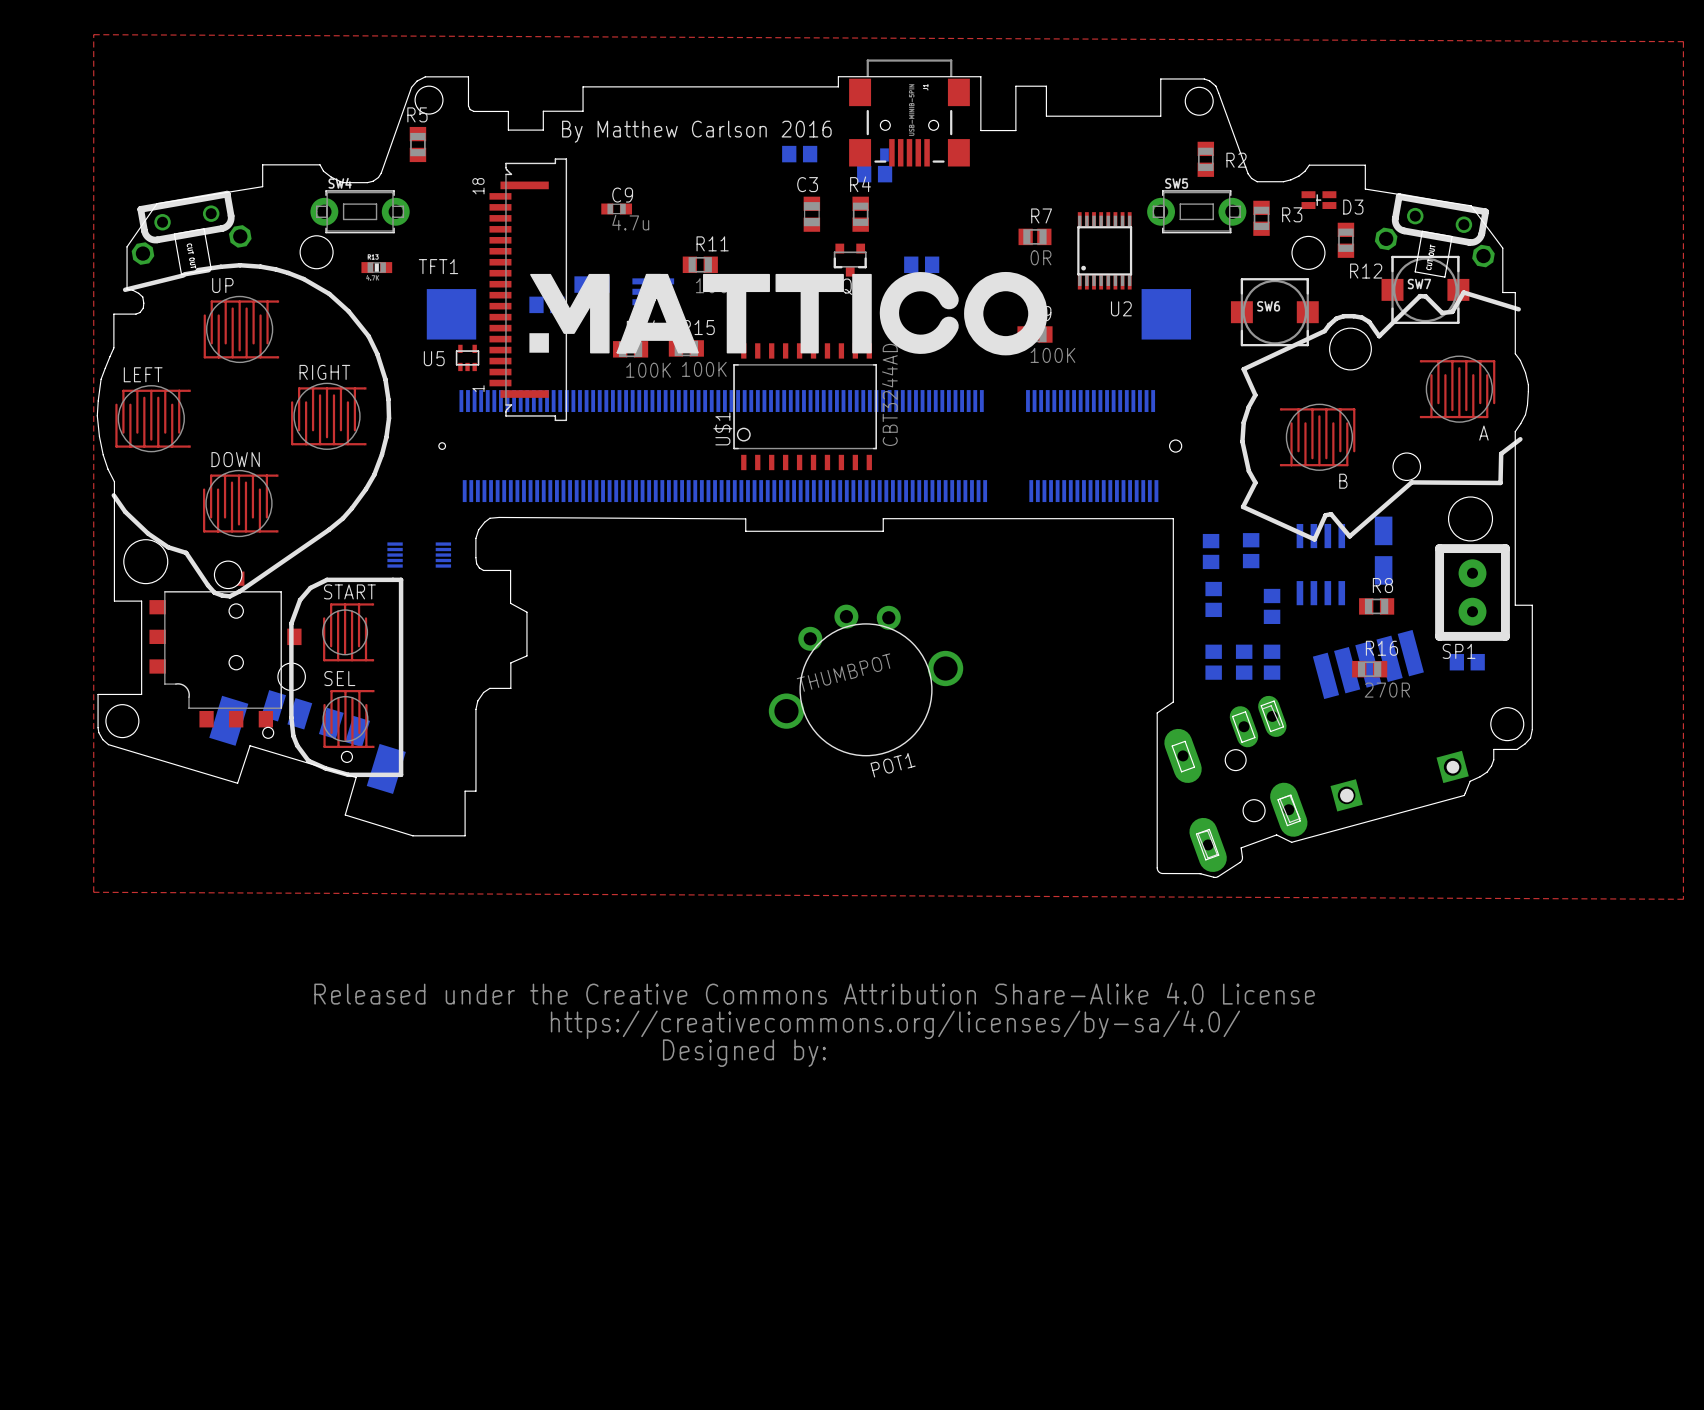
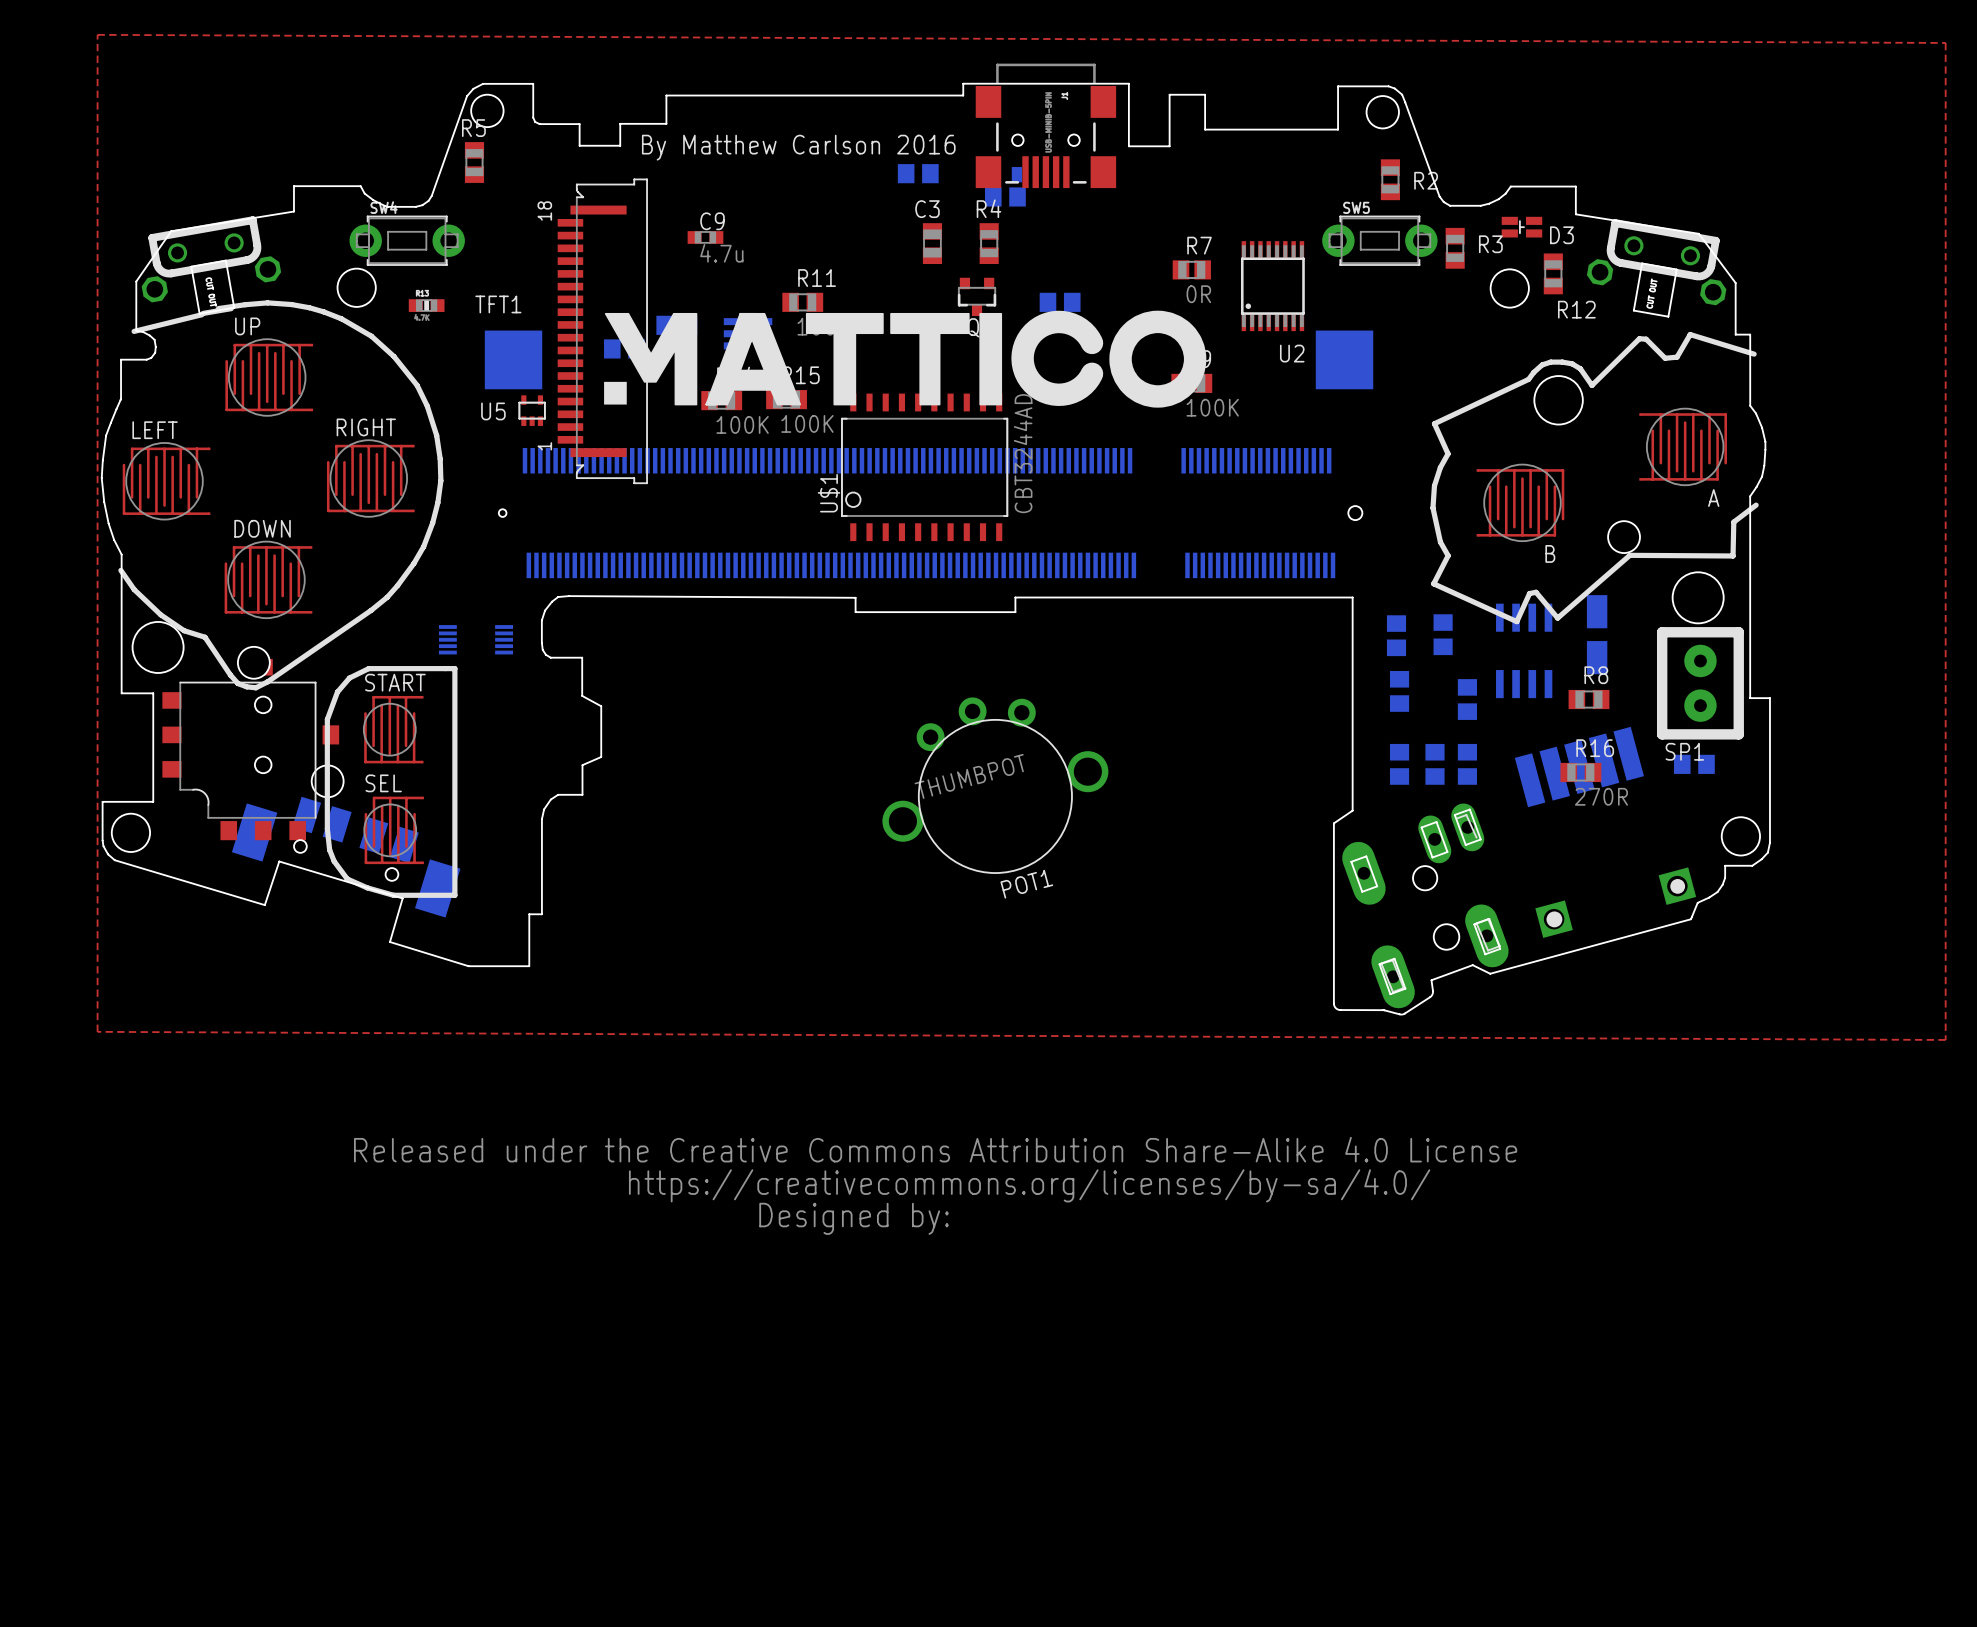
SW7: (1425, 289) -> none
SW6: (1274, 312) -> none

